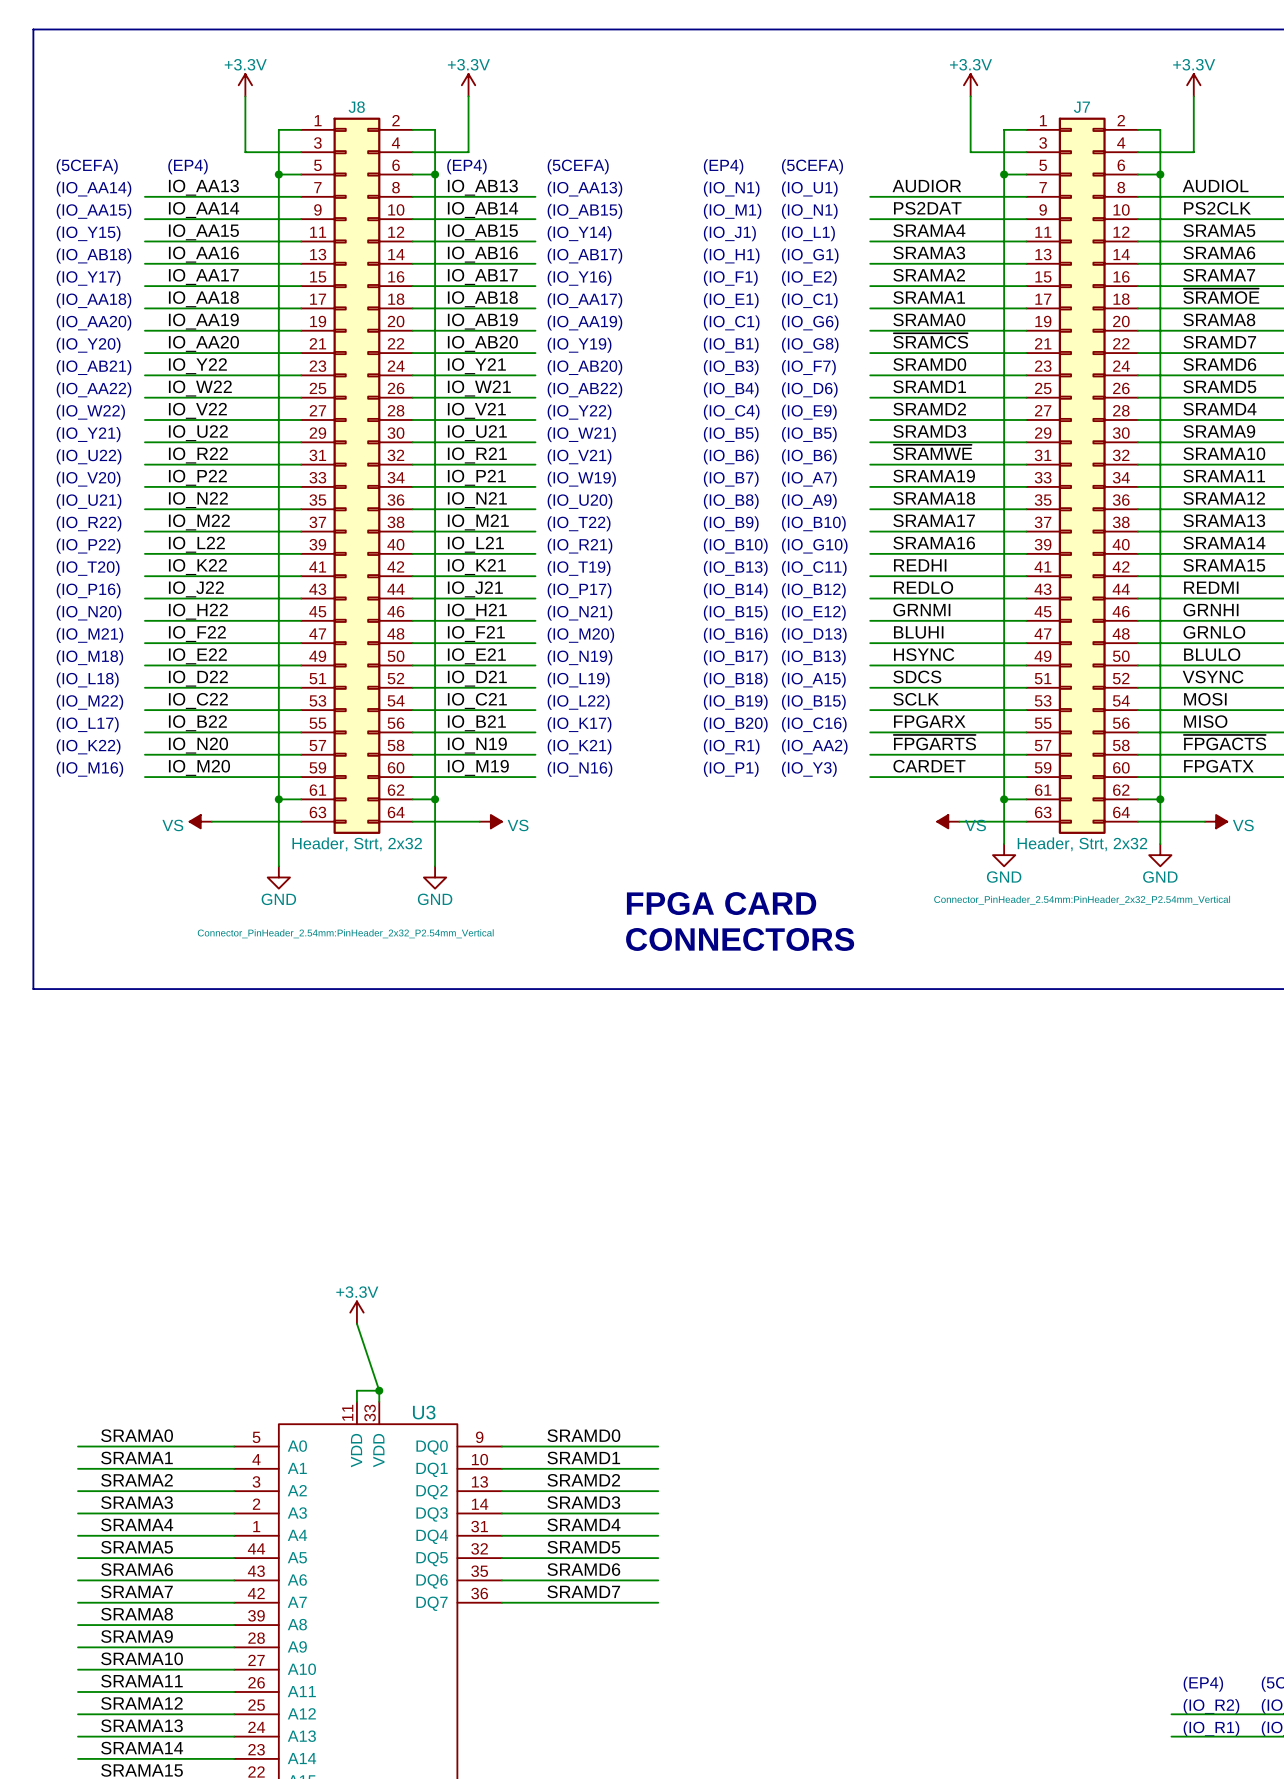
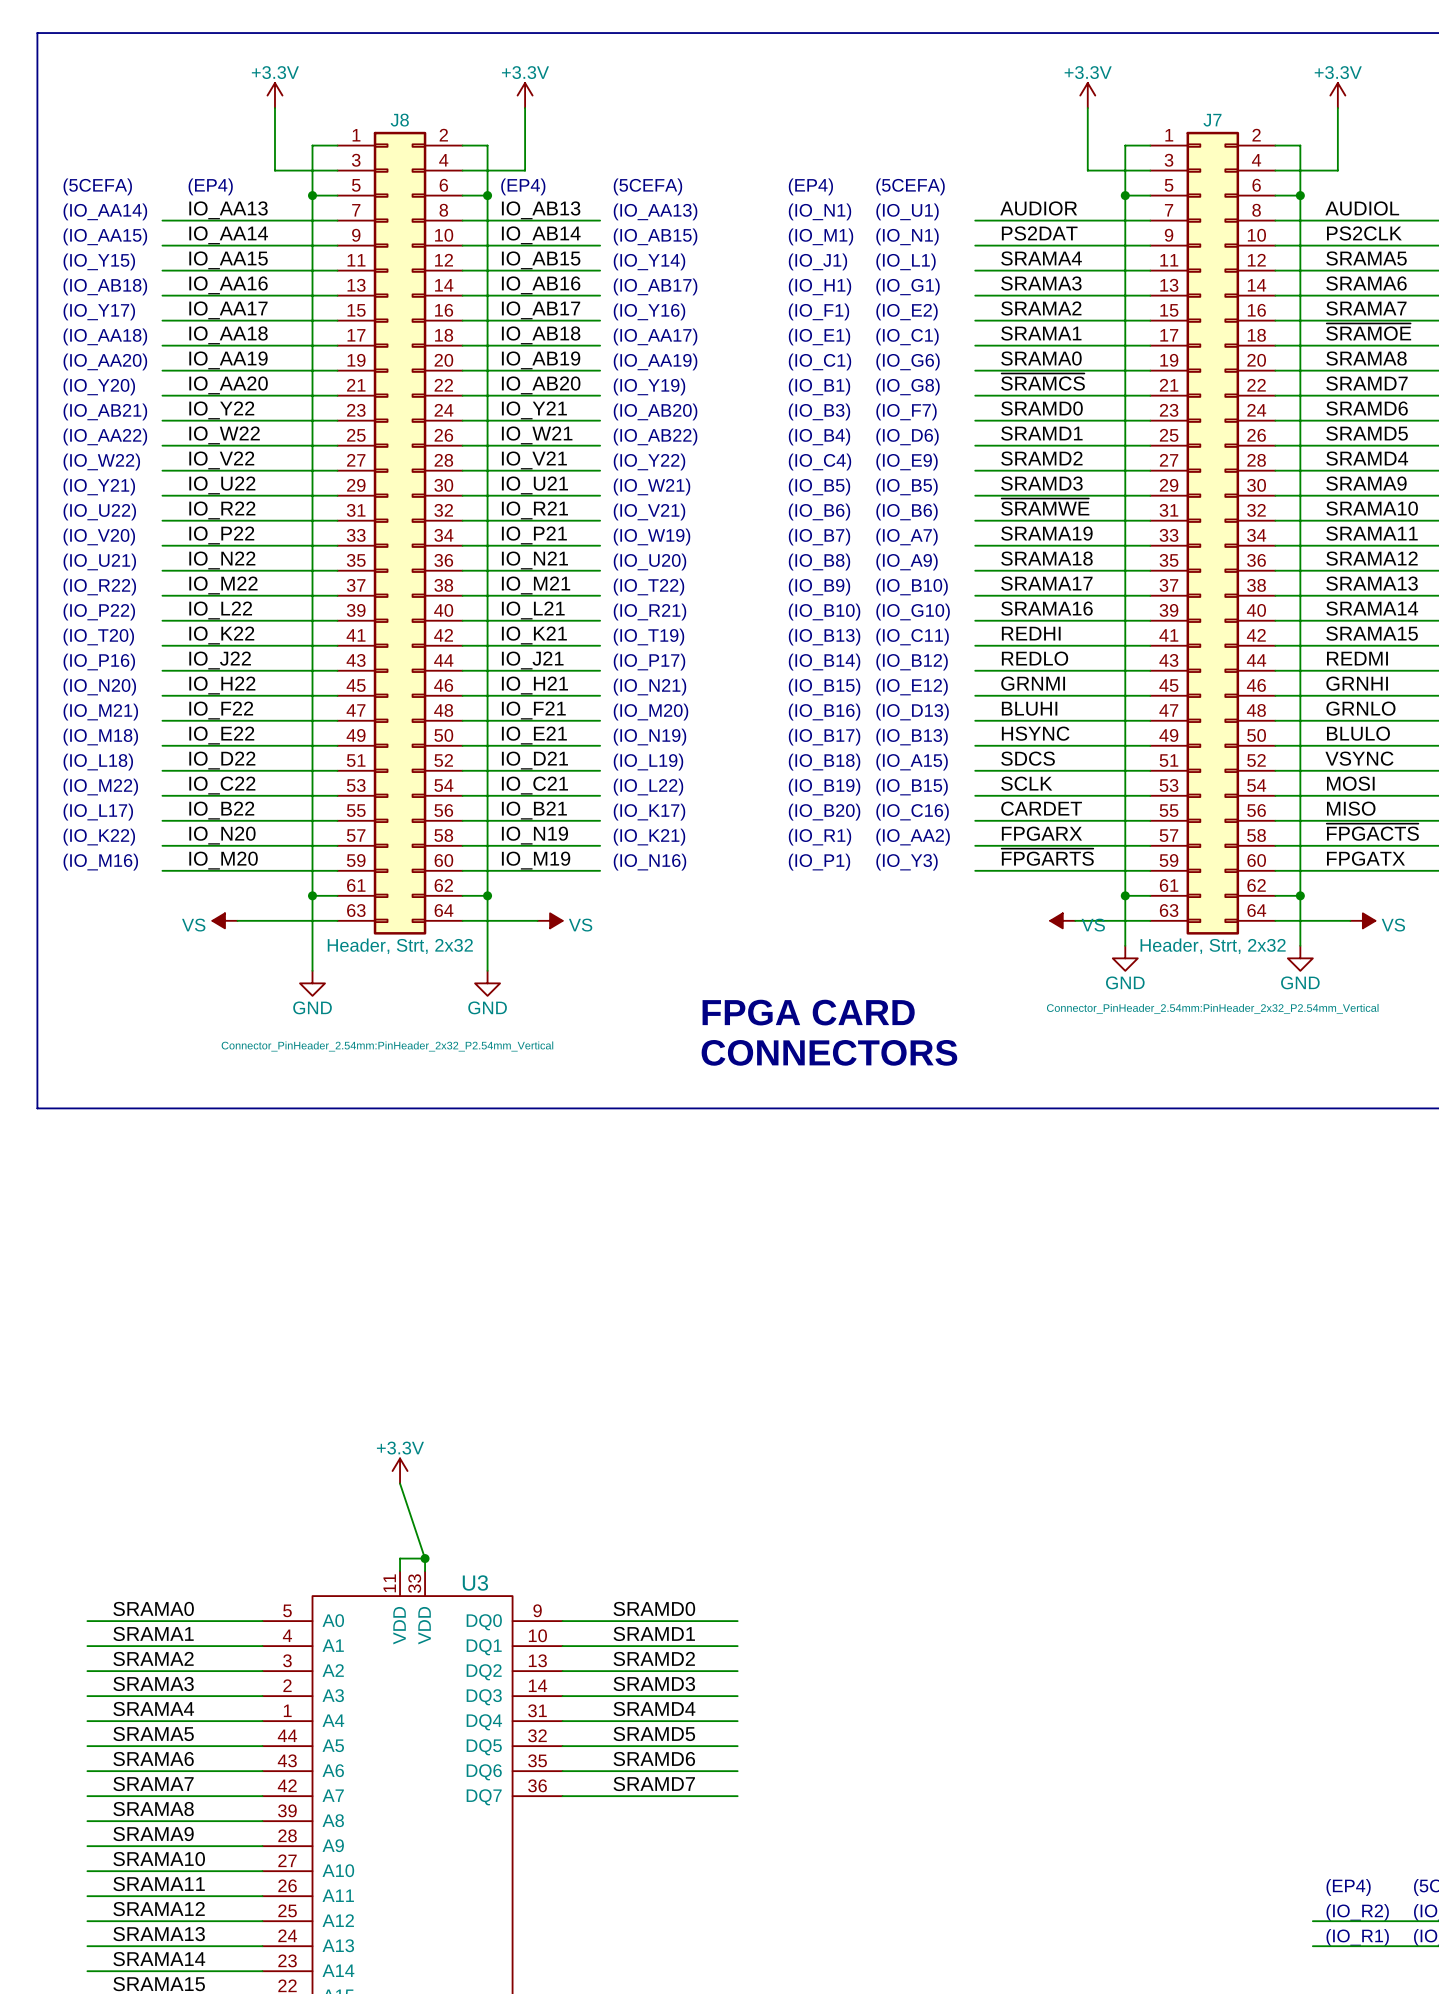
label: FPGARX (929, 721) -> CARDET (1041, 808)
label: ~{FPGARTS} (934, 742) -> FPGARX (1041, 833)
label: CARDET (929, 766) -> ~{FPGARTS} (1047, 857)

